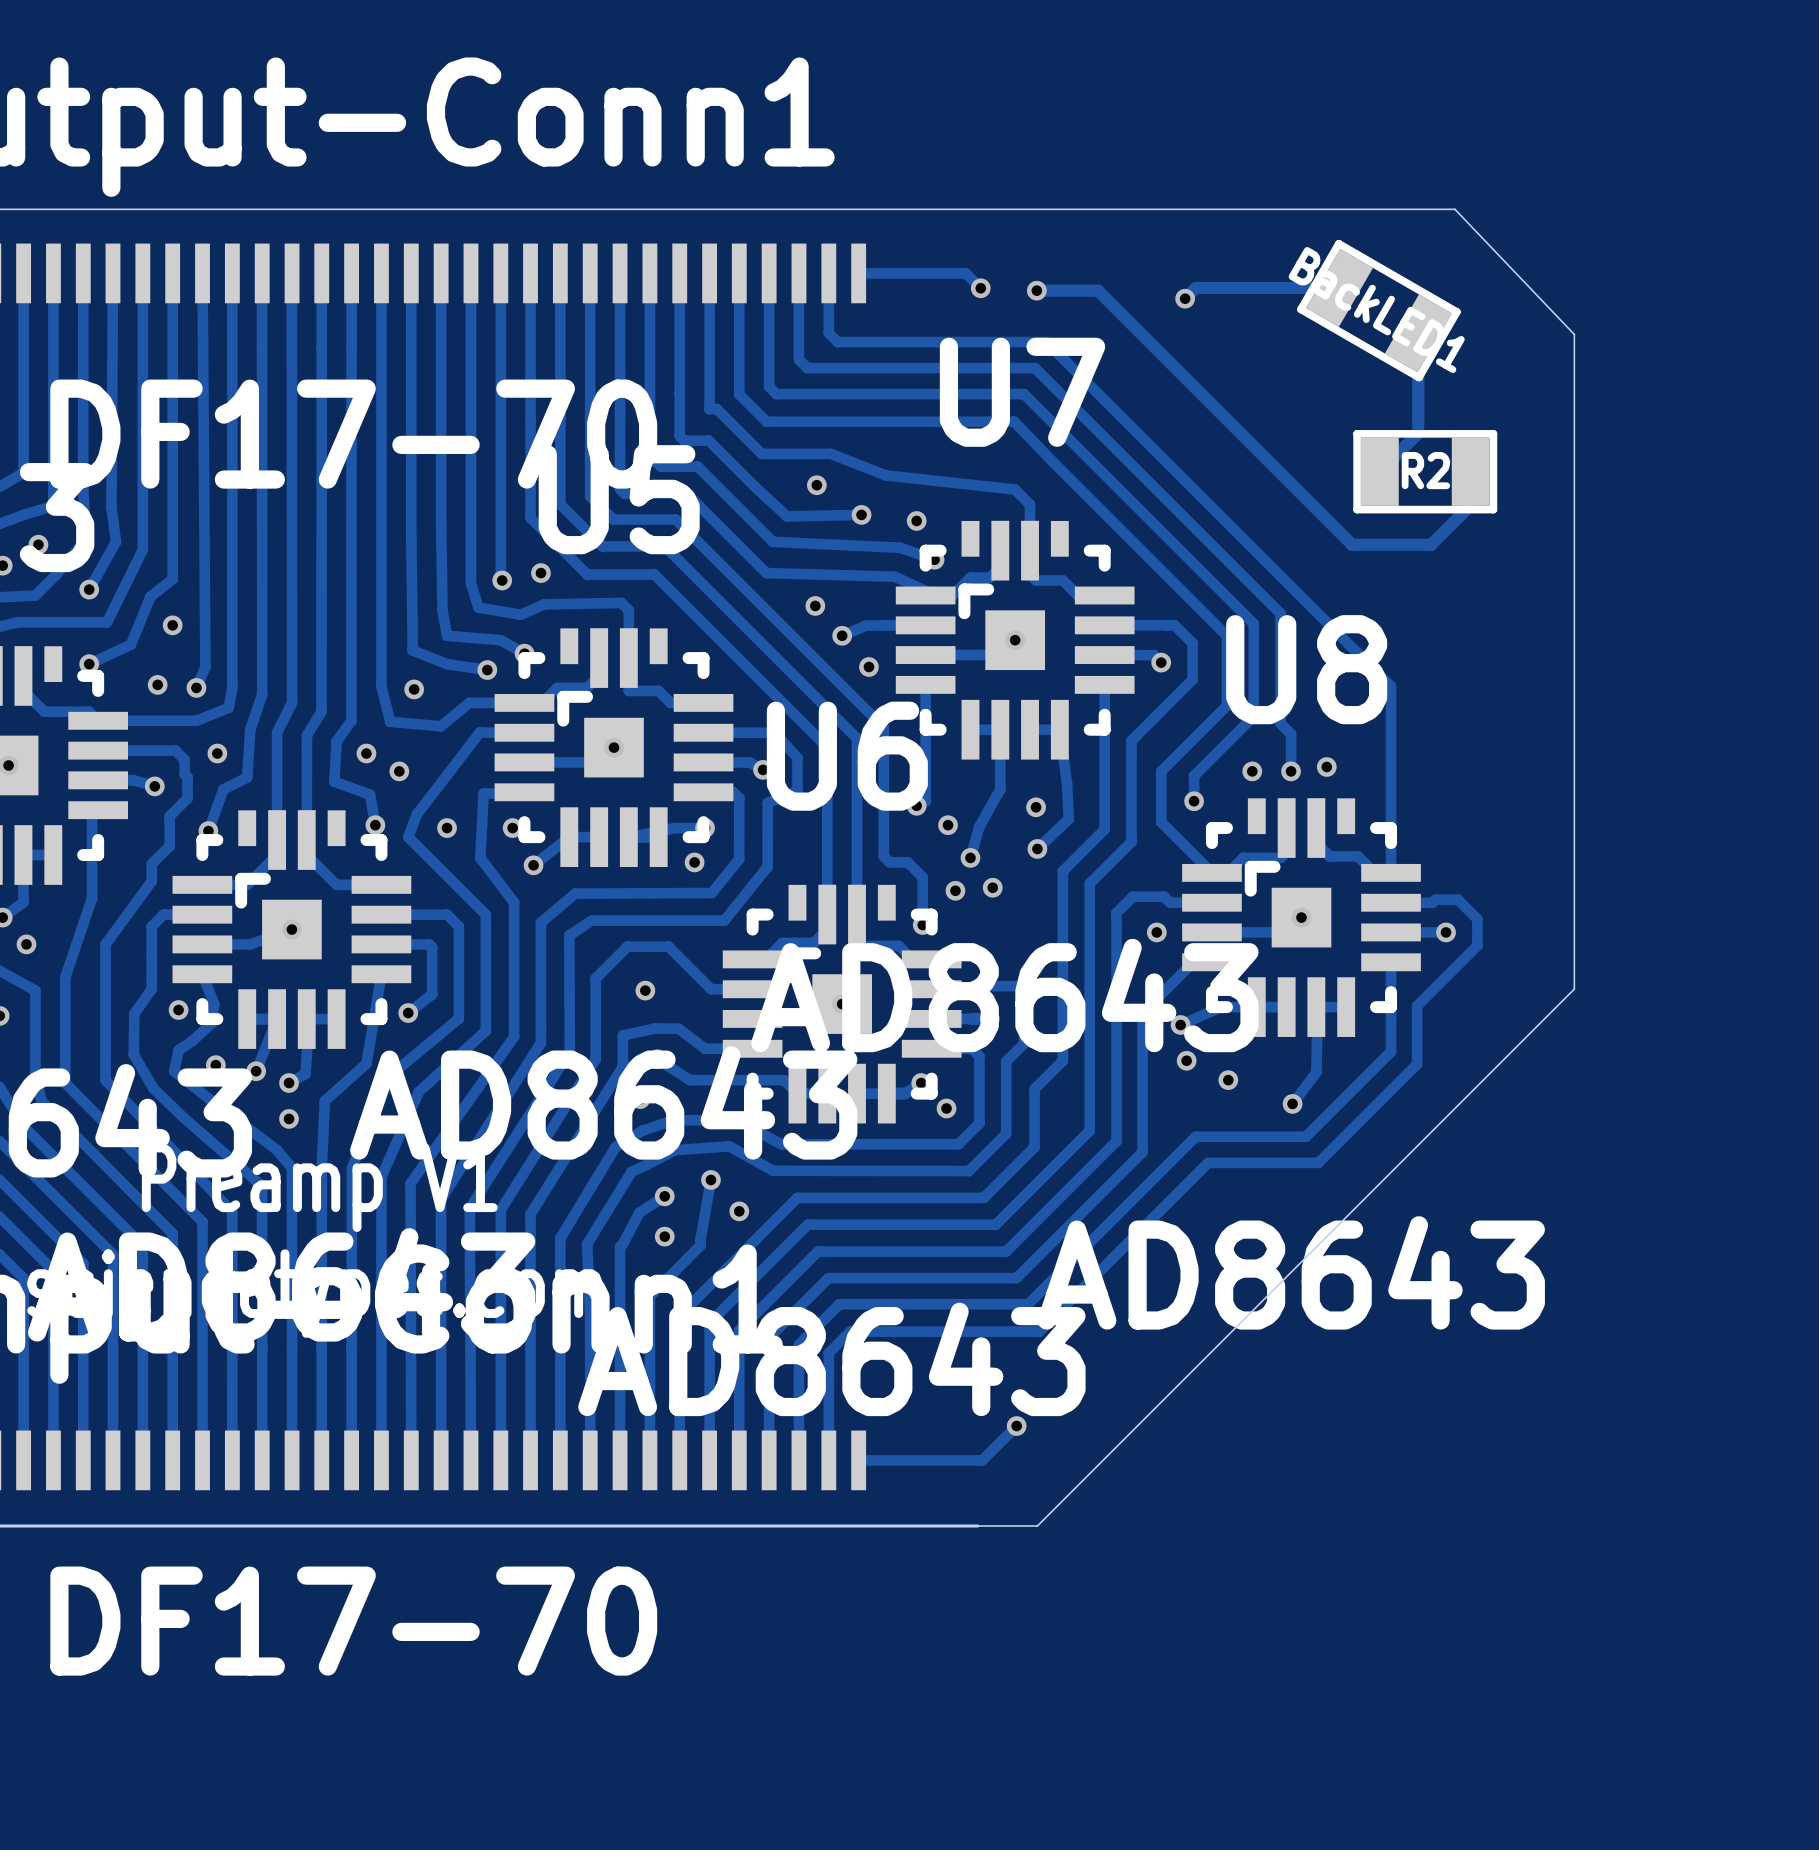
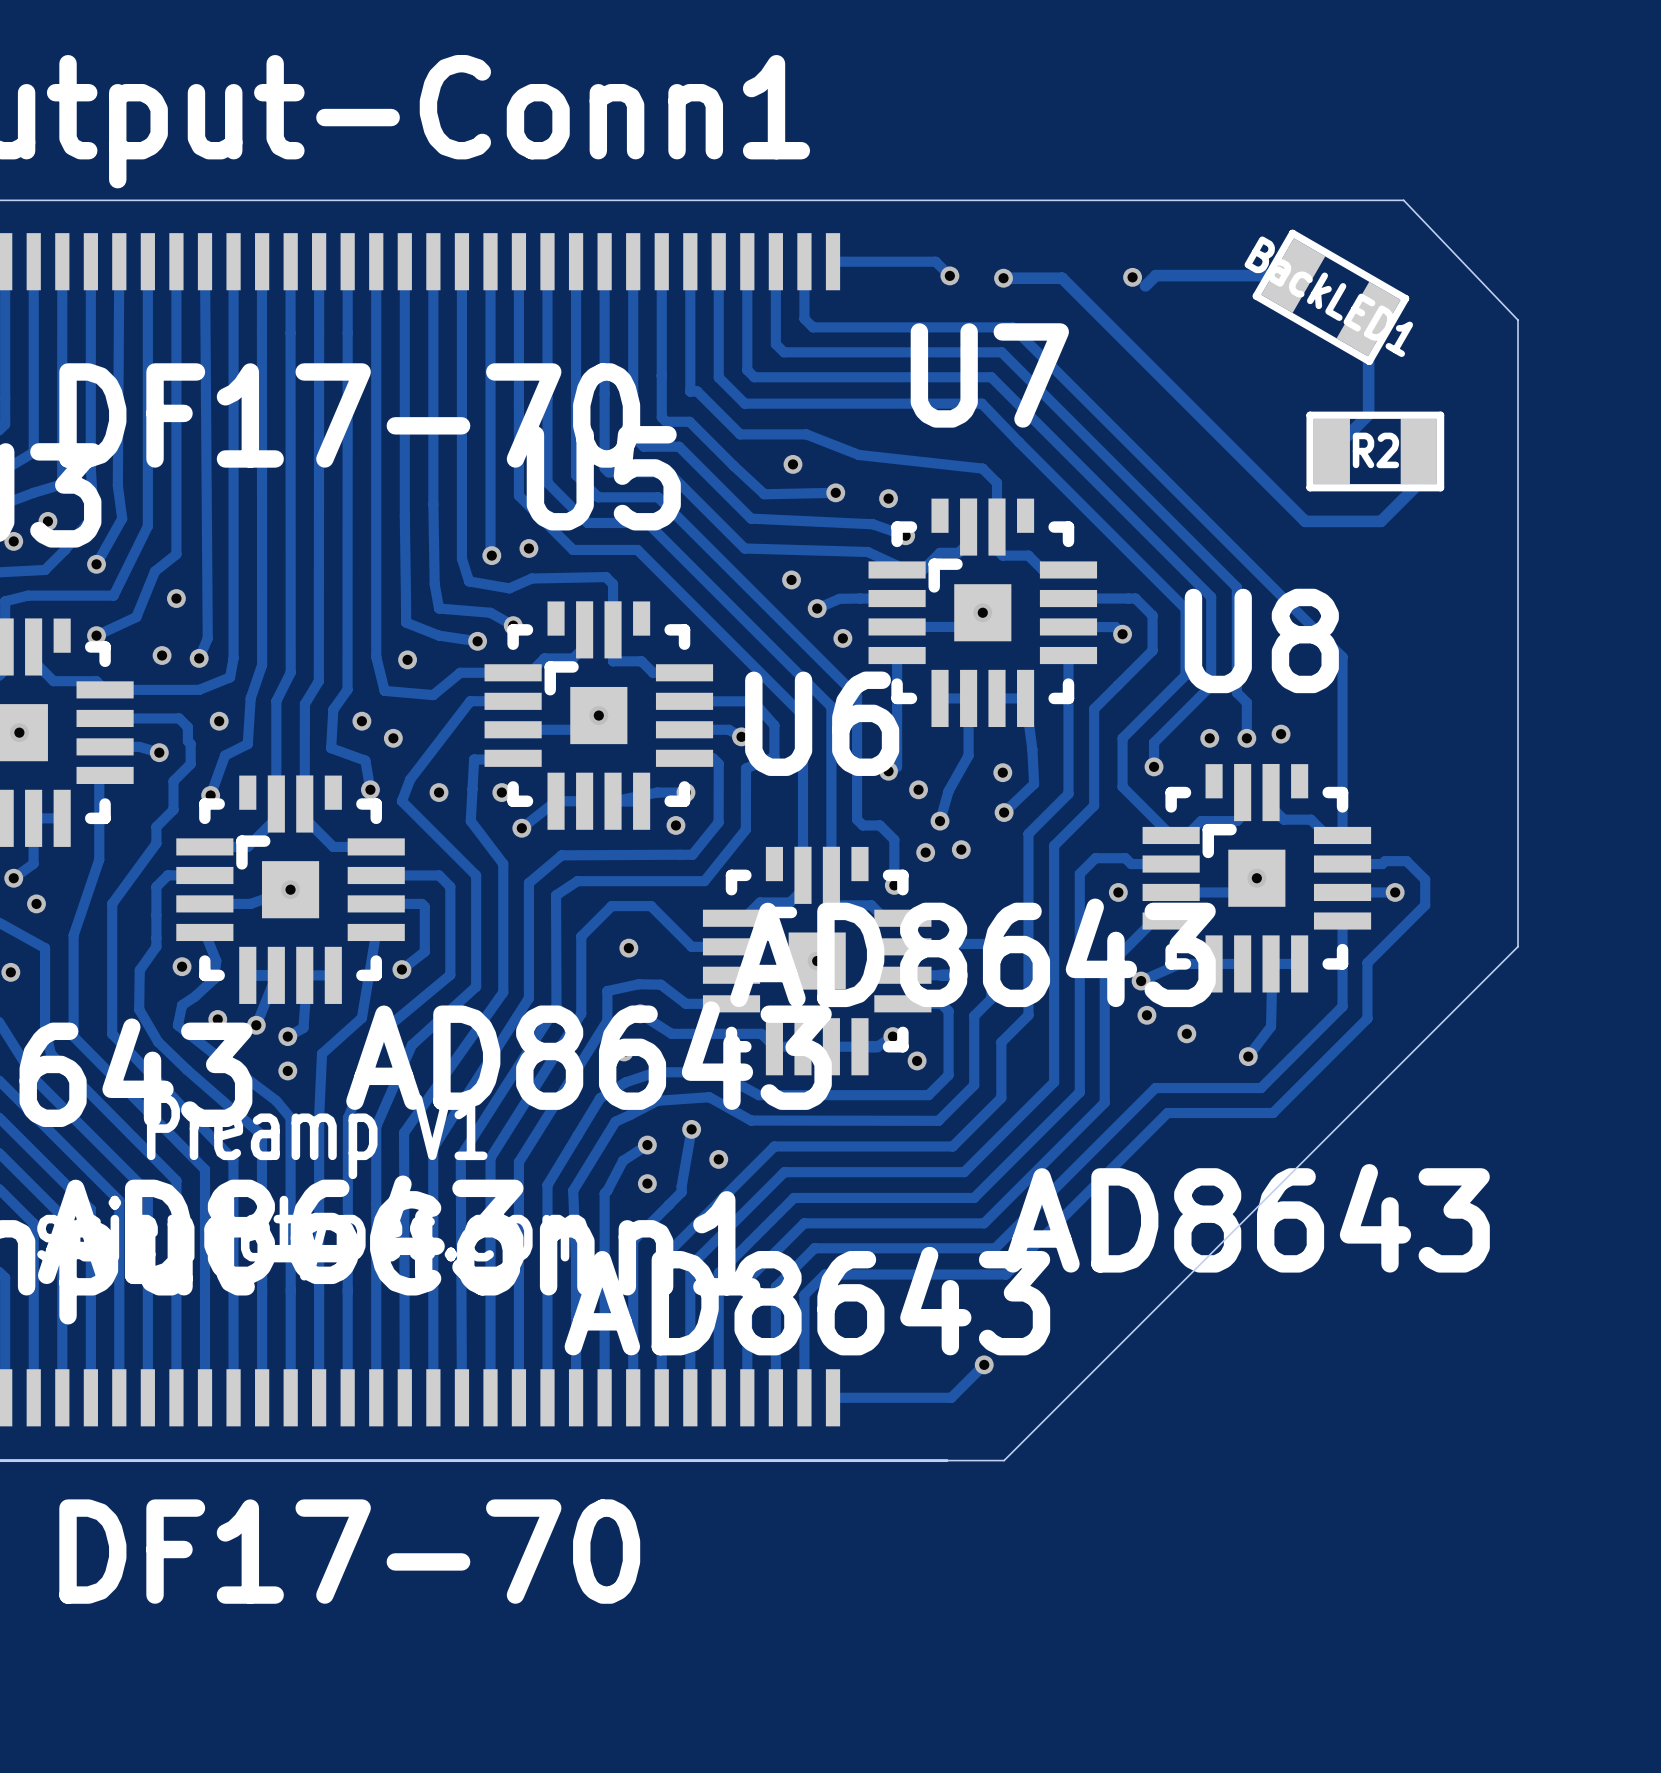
via position: (1185, 298) -> (1132, 277)

